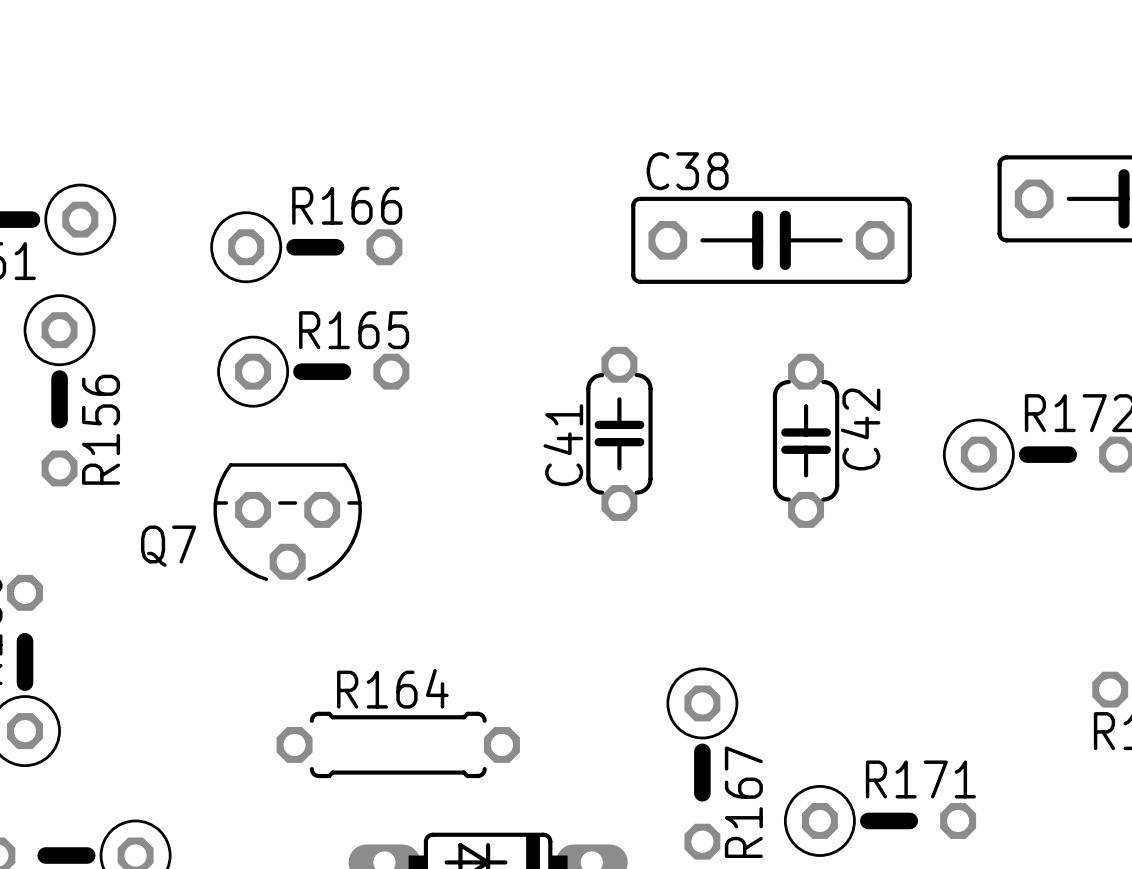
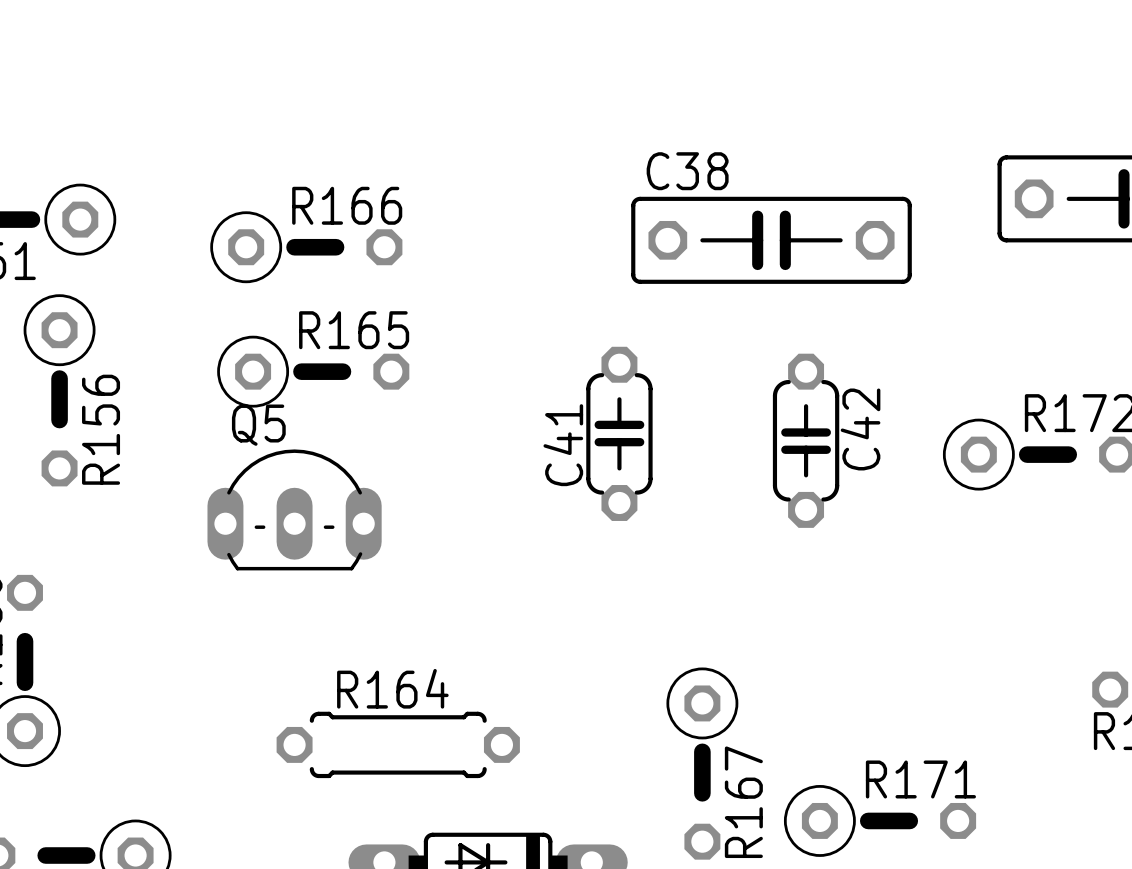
Q5: none -> (294, 509)
Q7: (287, 522) -> none

